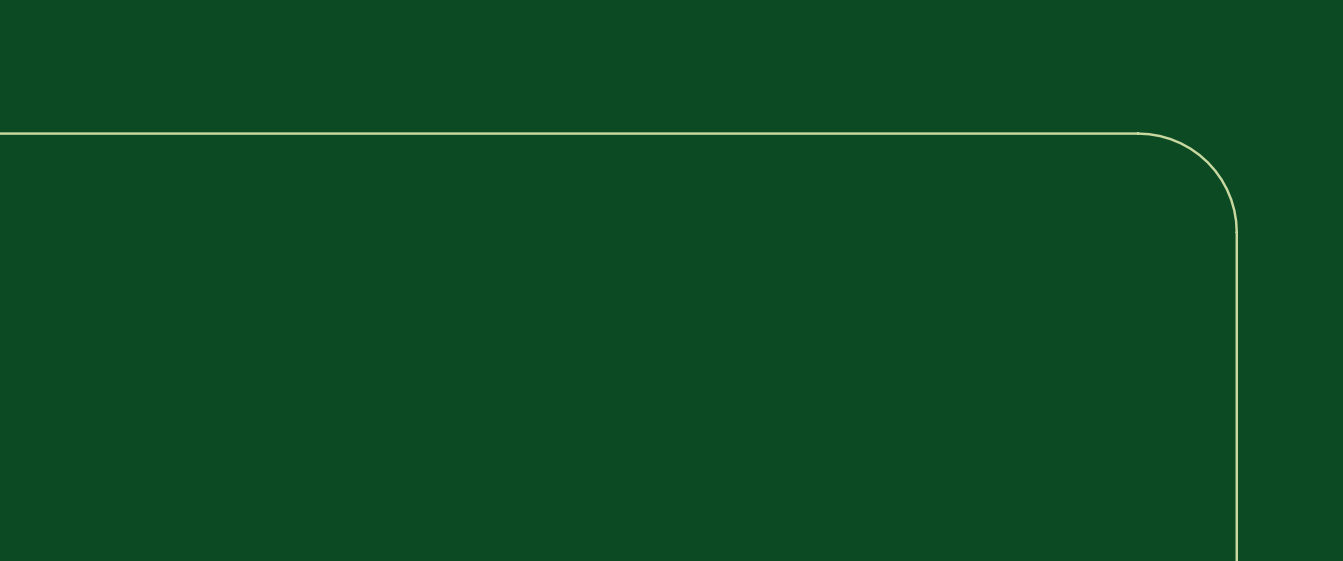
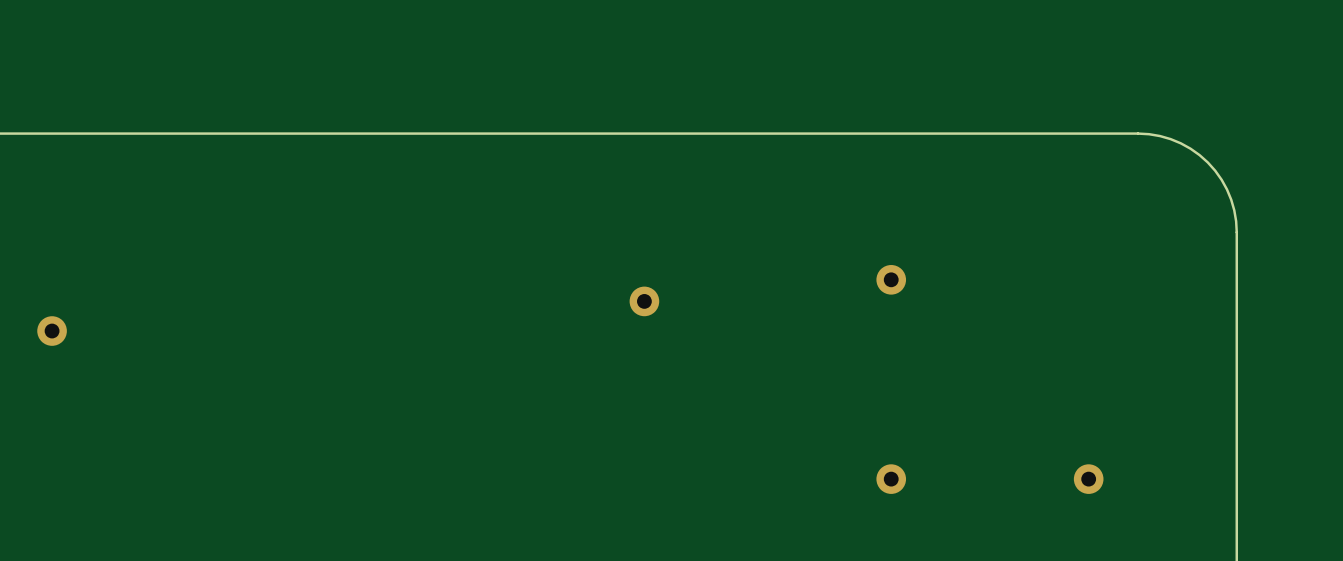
via: none -> (891, 279)
via: none -> (644, 301)
via: none -> (52, 331)
via: none -> (891, 479)
via: none -> (1088, 479)

